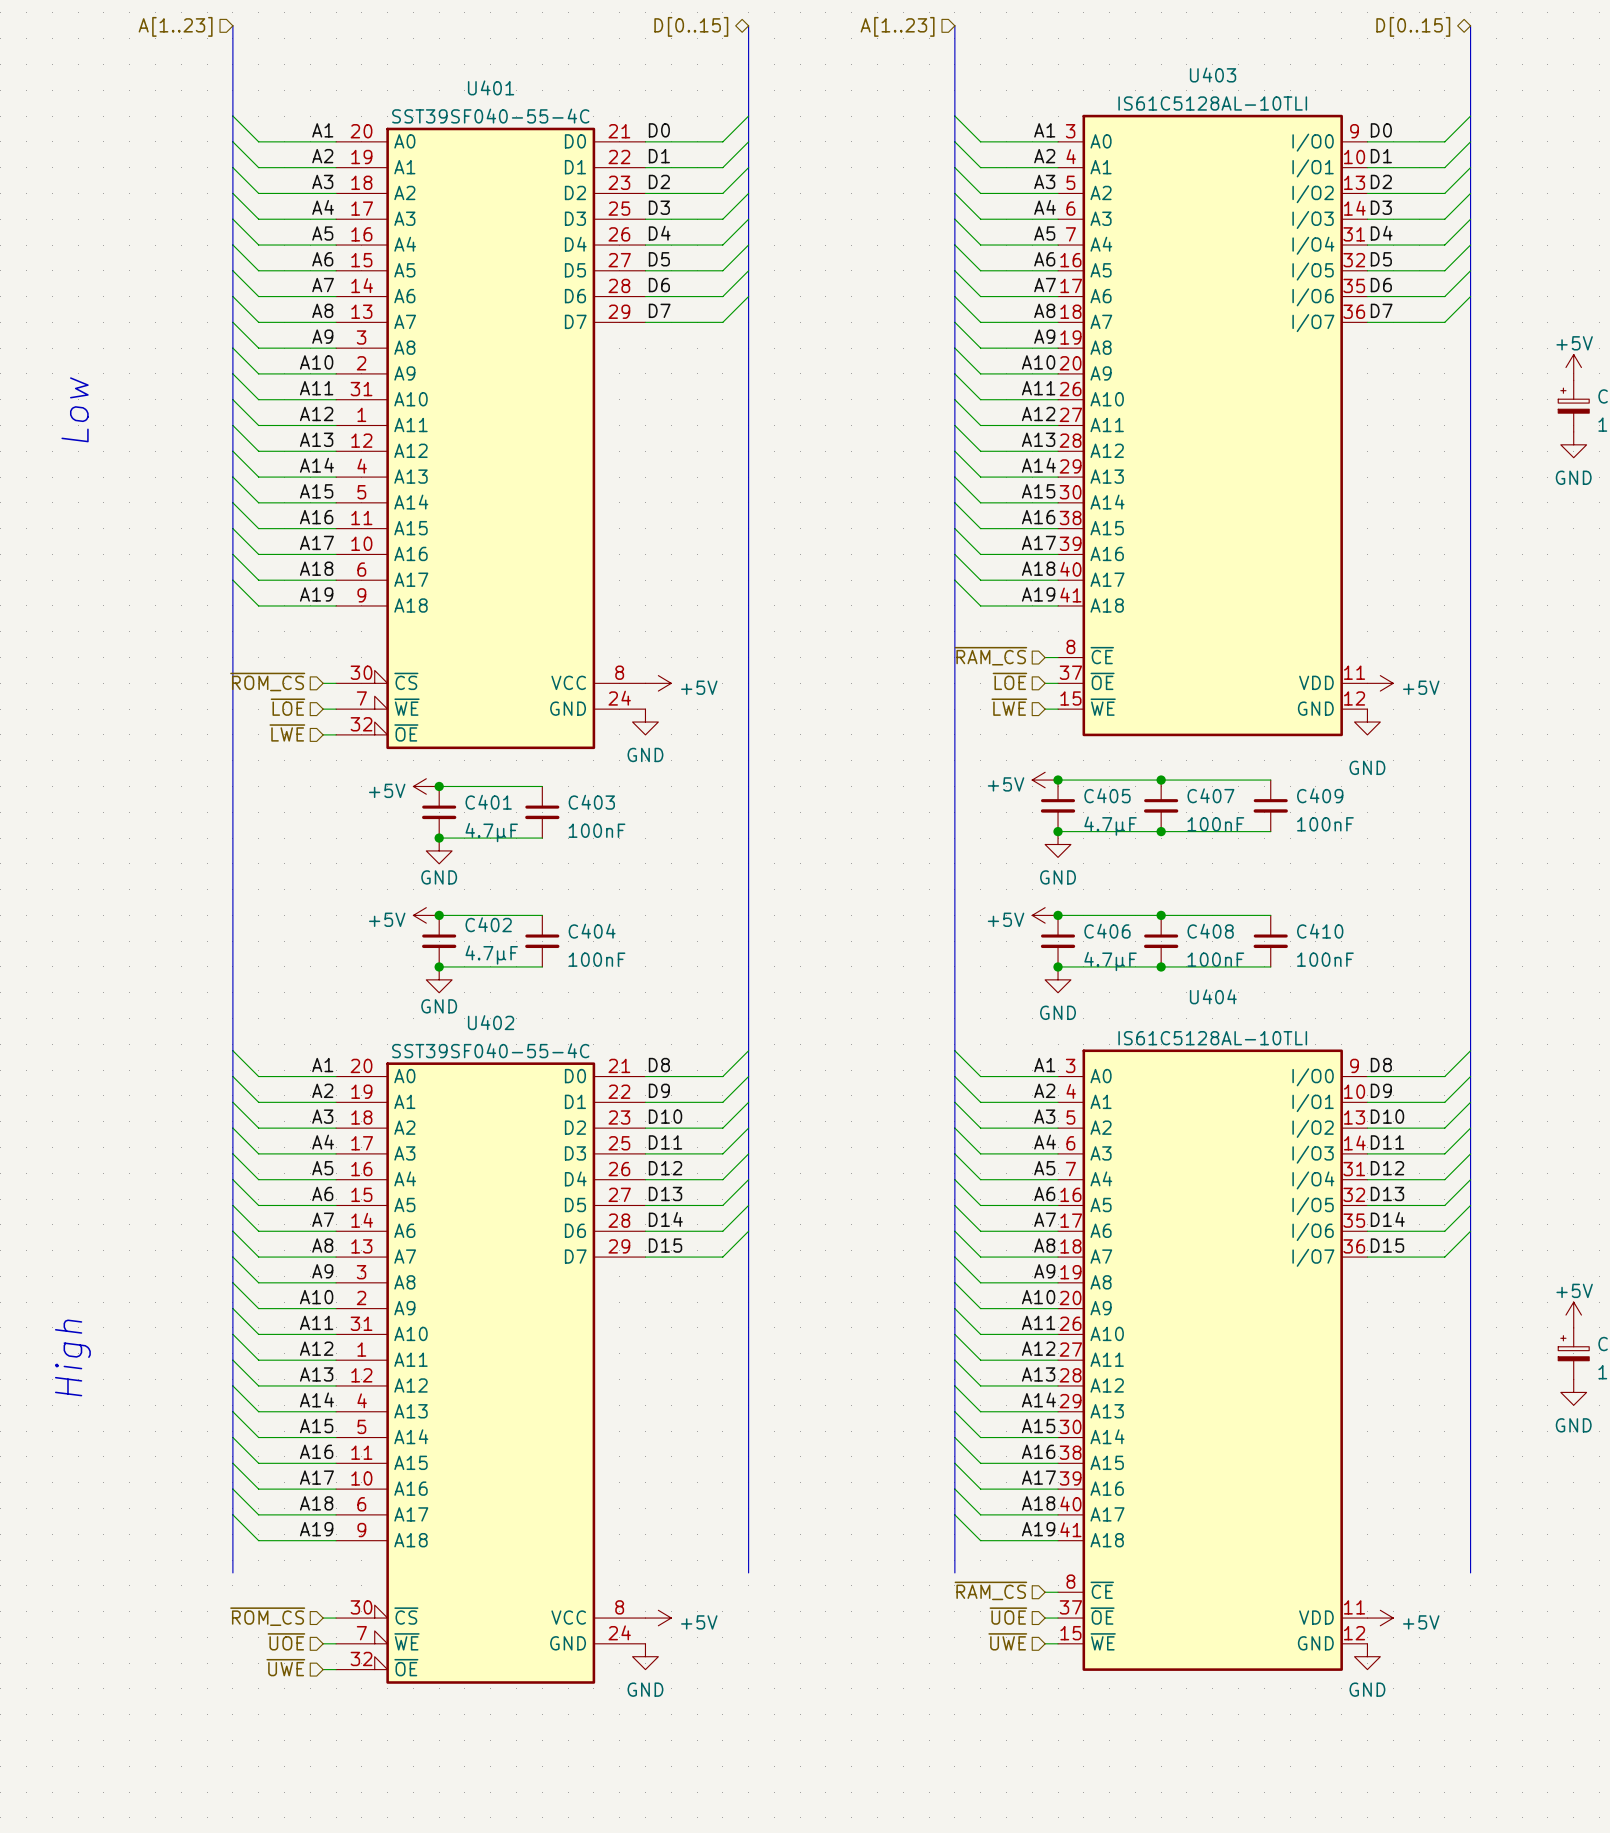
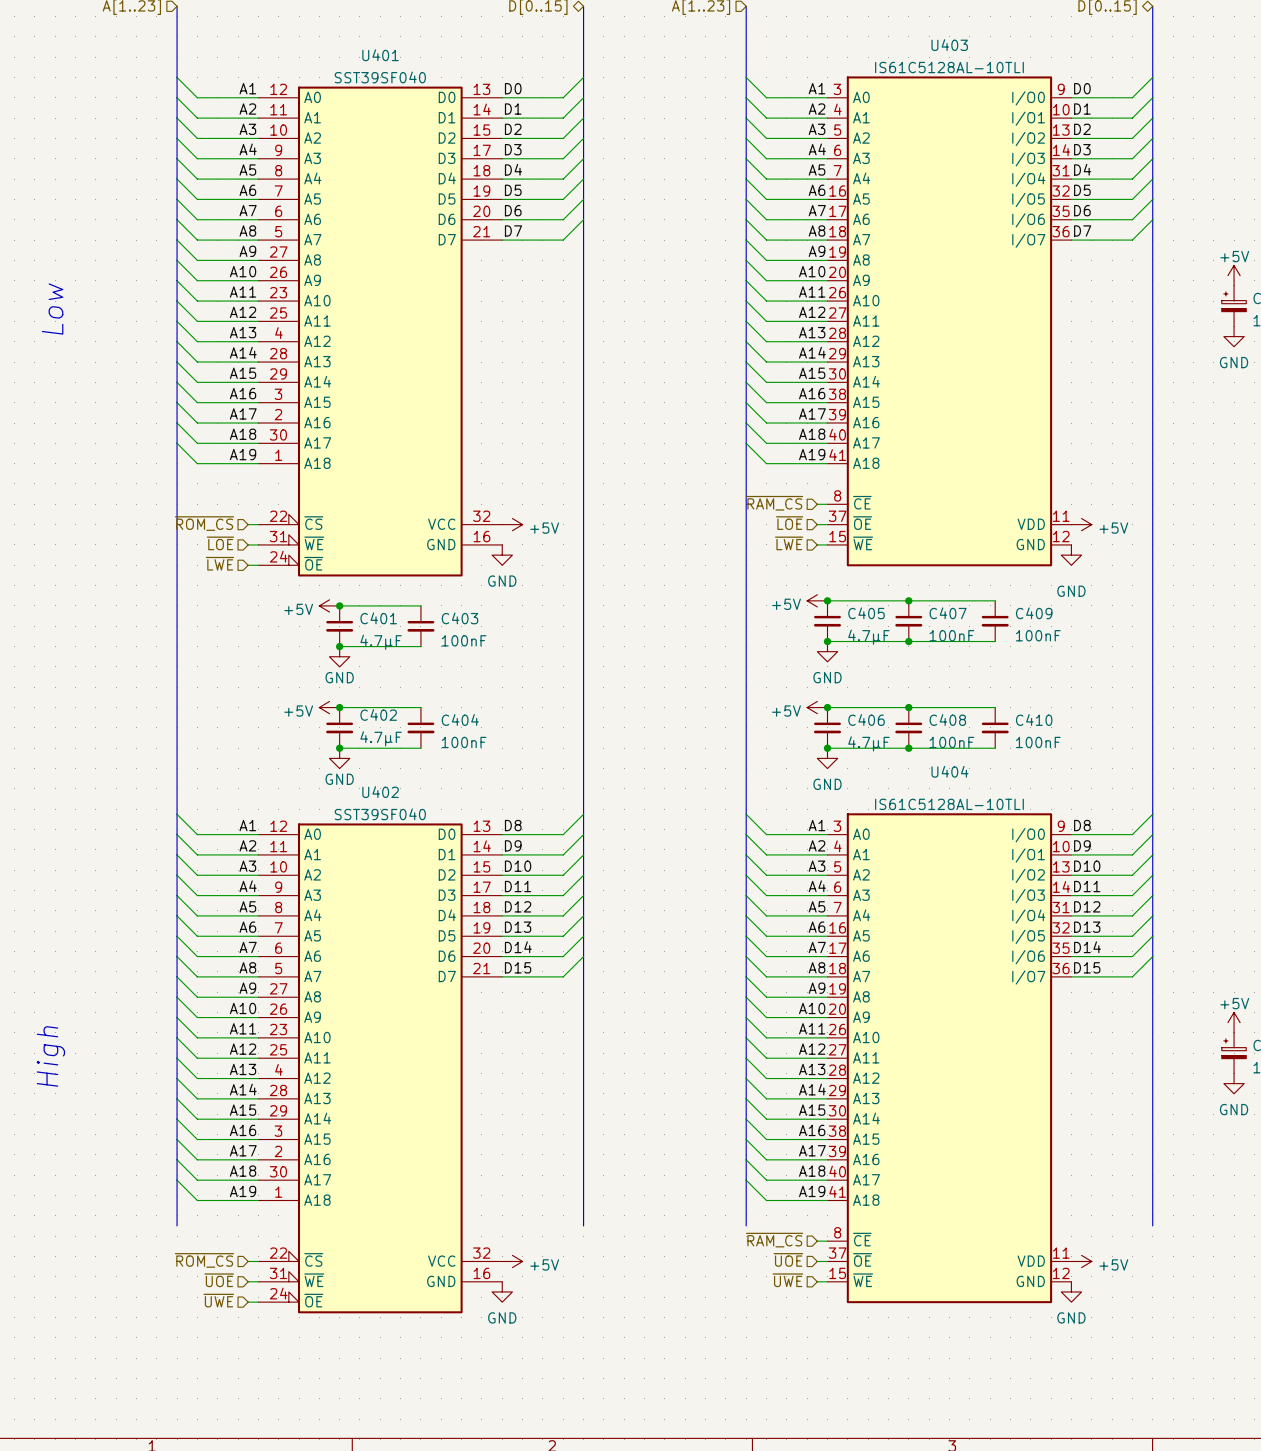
U401 value: SST39SF040-55-4C (490, 116) -> SST39SF040 (380, 77)
U401 symbol: [336, 127, 646, 750] -> [258, 86, 503, 577]
U402 value: SST39SF040-55-4C (490, 1050) -> SST39SF040 (380, 814)
U402 symbol: [336, 1062, 646, 1684] -> [258, 823, 503, 1314]

